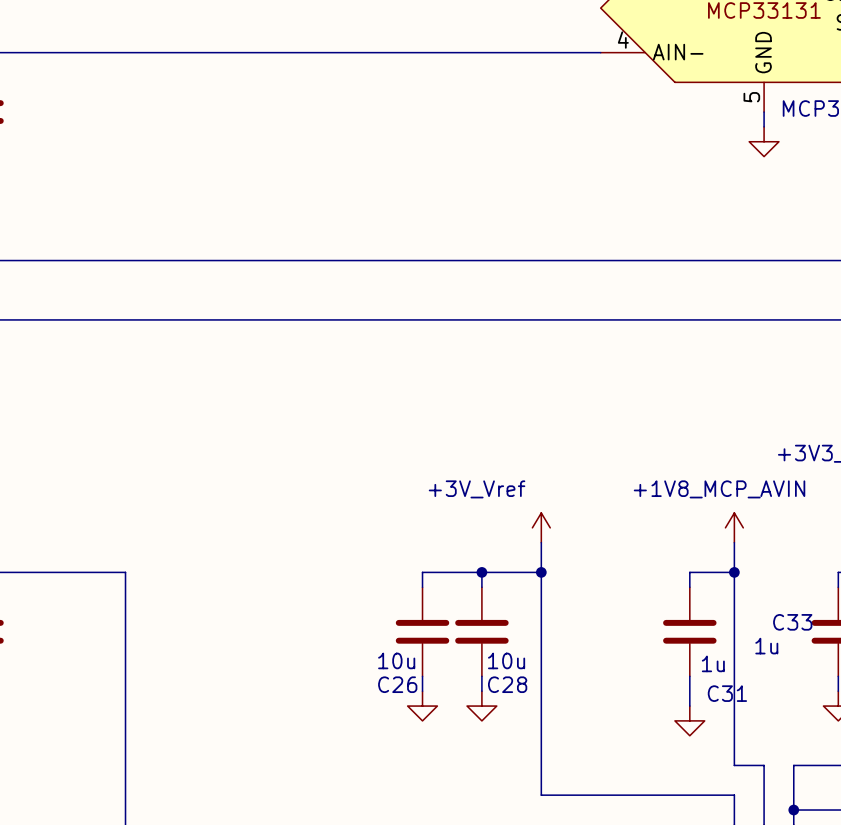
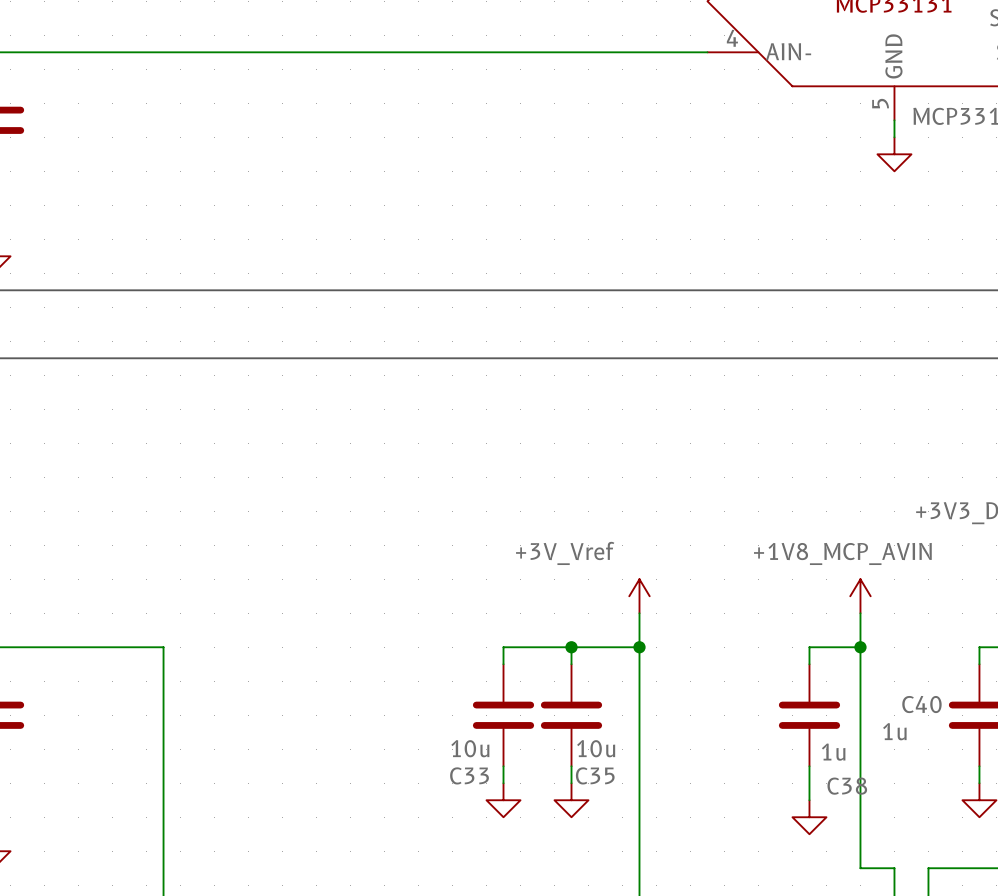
C33 name: C33 (792, 622) -> C40 (921, 704)
C26 name: C26 (397, 684) -> C33 (469, 775)
C28 name: C28 (507, 684) -> C35 (595, 775)
C31 name: C31 (727, 693) -> C38 (847, 786)

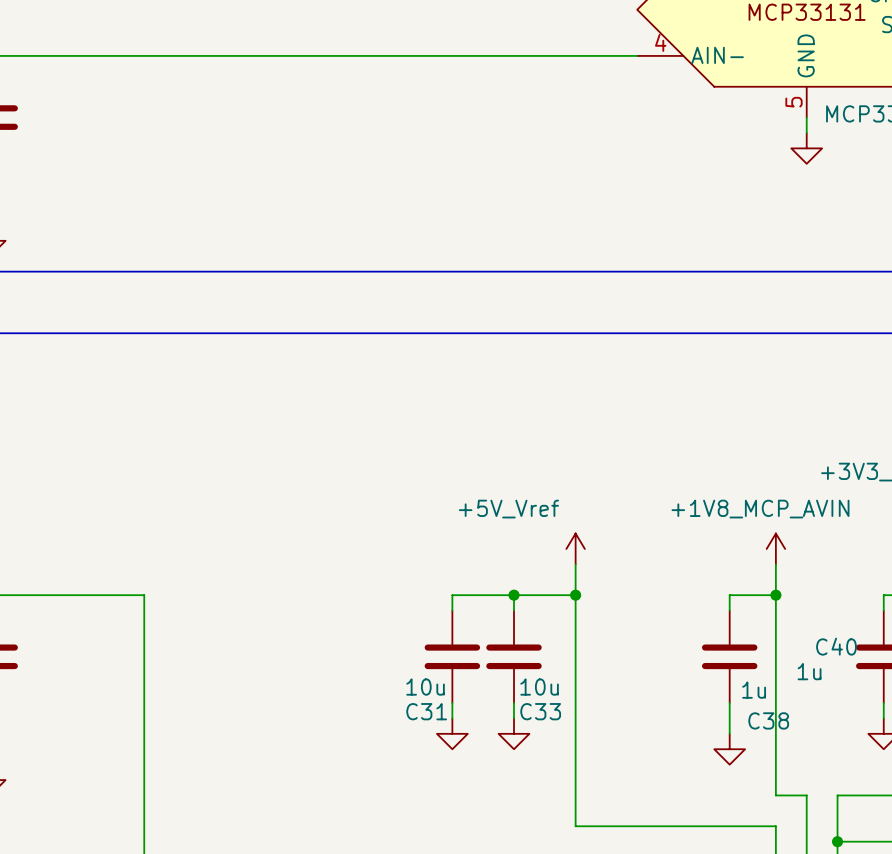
power symbol: +3V_Vref (639, 596) -> +5V_Vref (575, 548)
C33 name: C33 (469, 775) -> C31 (426, 711)
C35 name: C35 (595, 775) -> C33 (540, 711)

